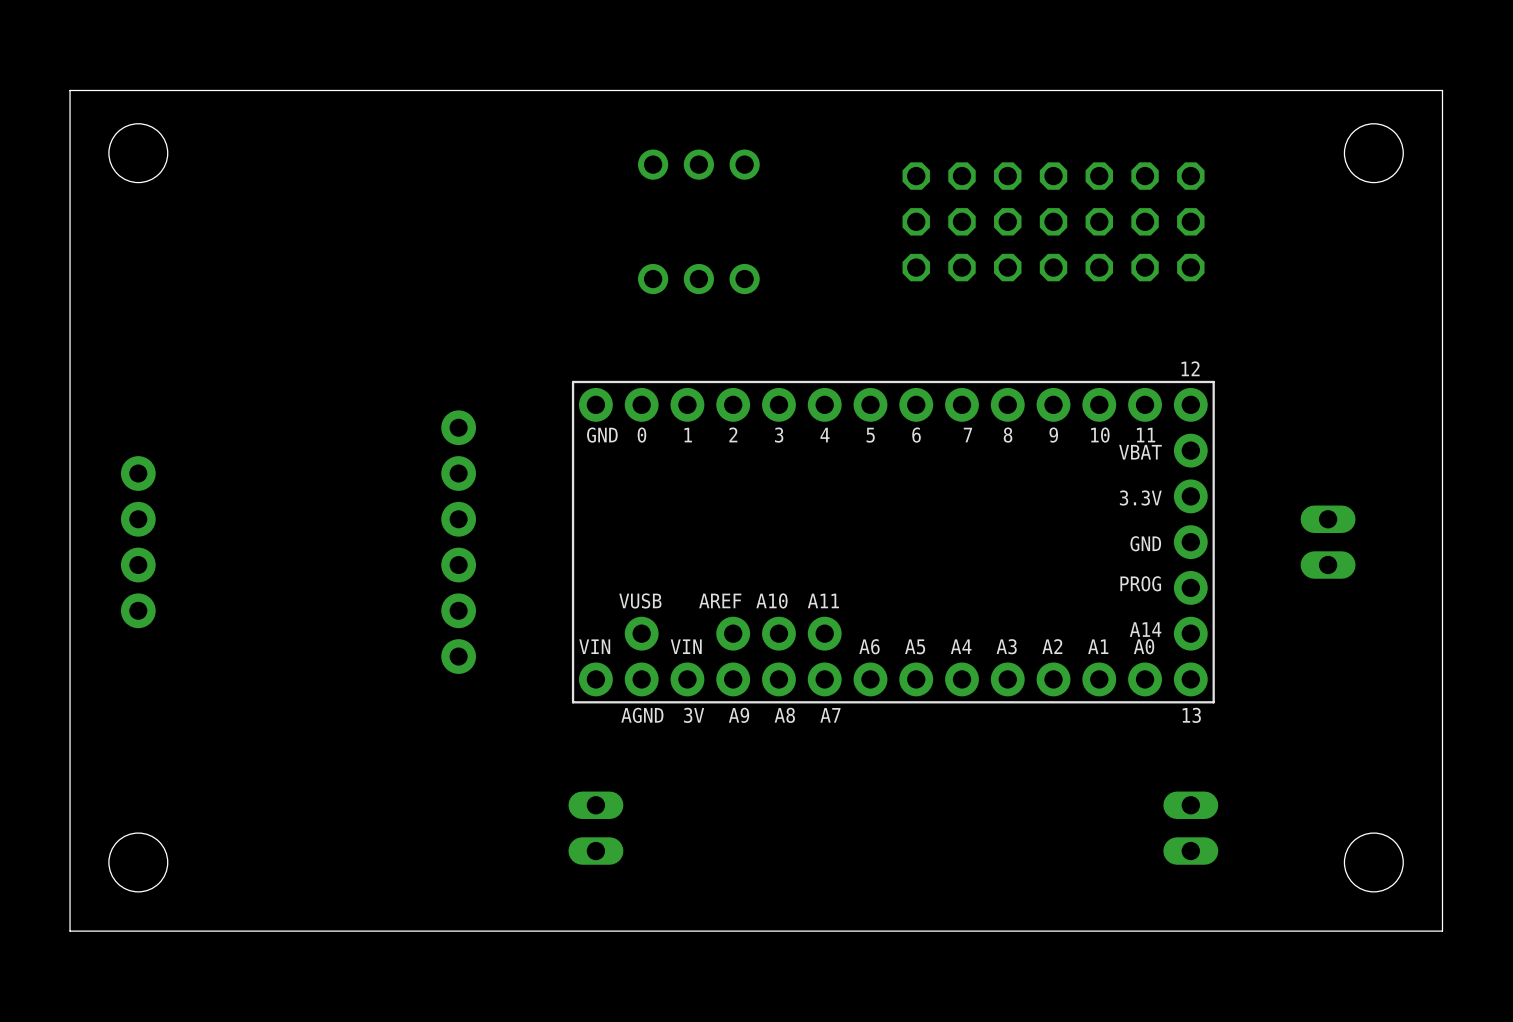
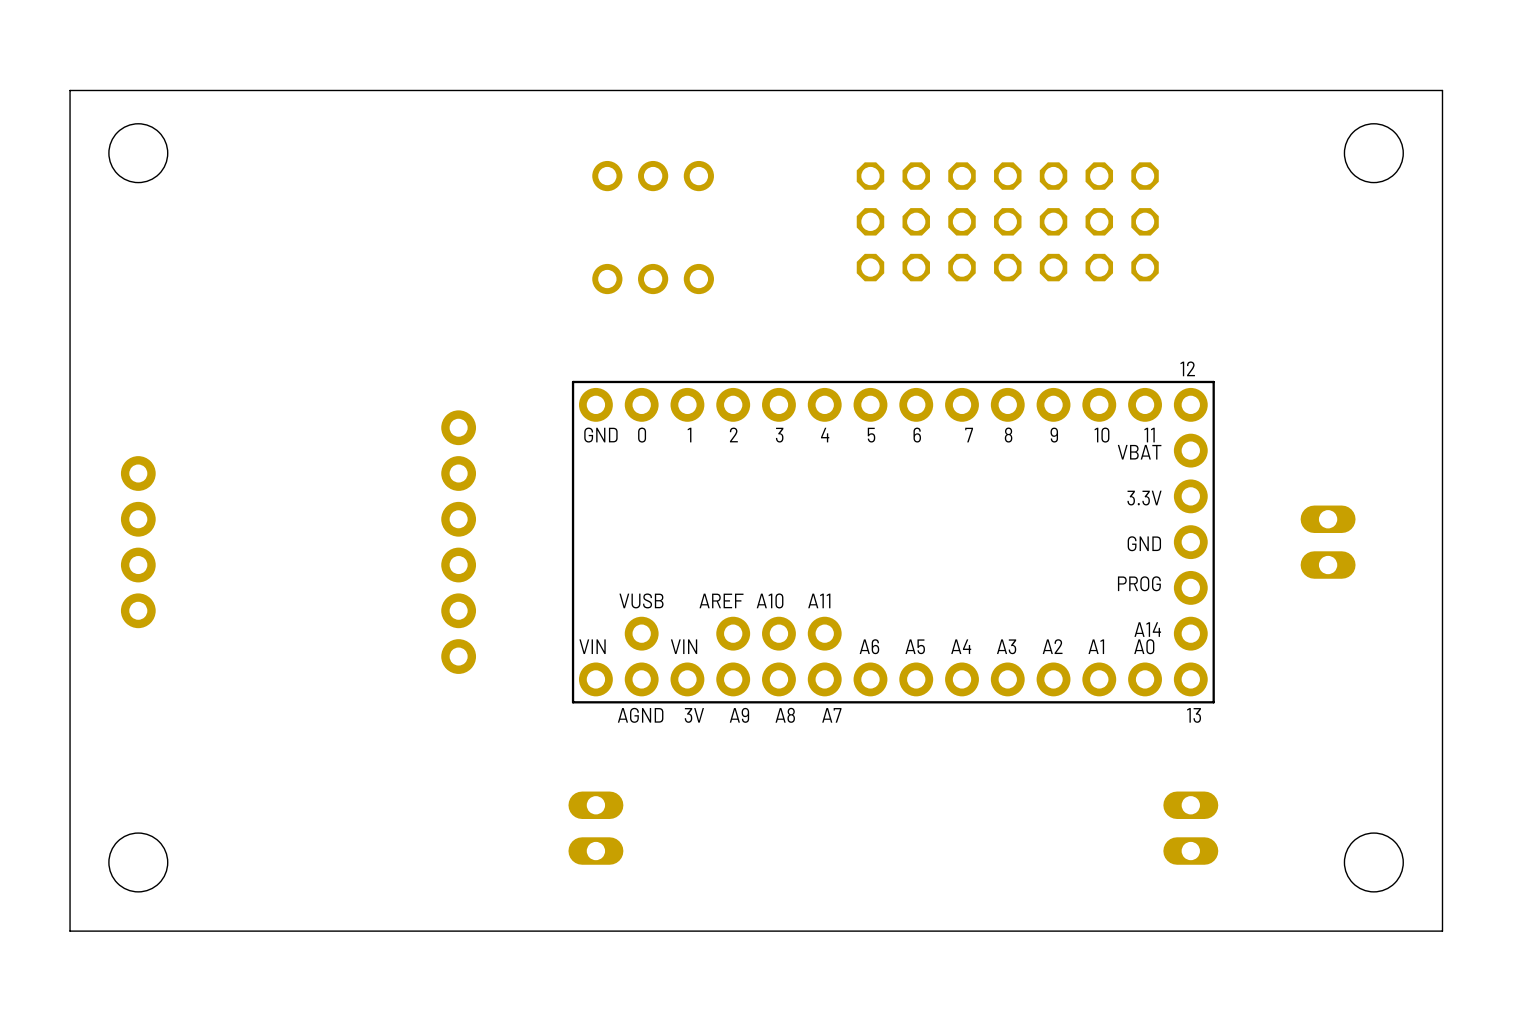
part position: (698, 164) -> (653, 176)
part: none -> (870, 176)
part: (1190, 176) -> none
part: none -> (870, 221)
part: (1190, 221) -> none
part: none -> (870, 267)
part: (1190, 267) -> none
part position: (698, 279) -> (653, 279)

